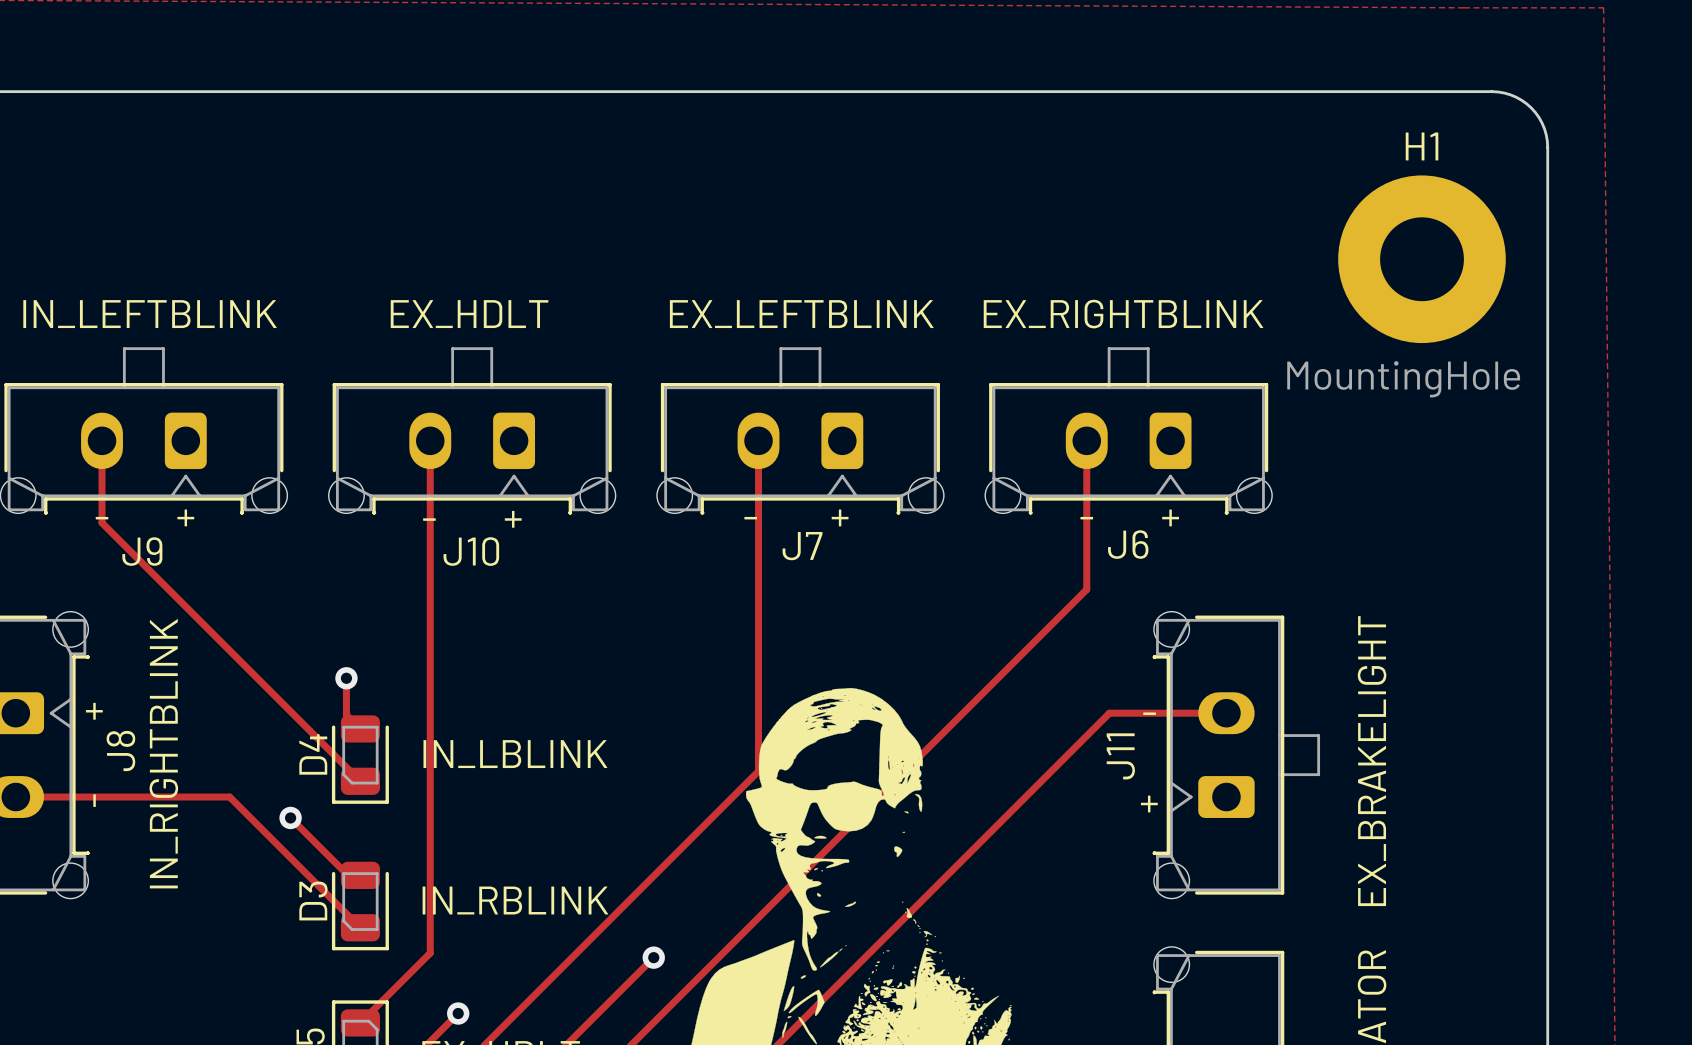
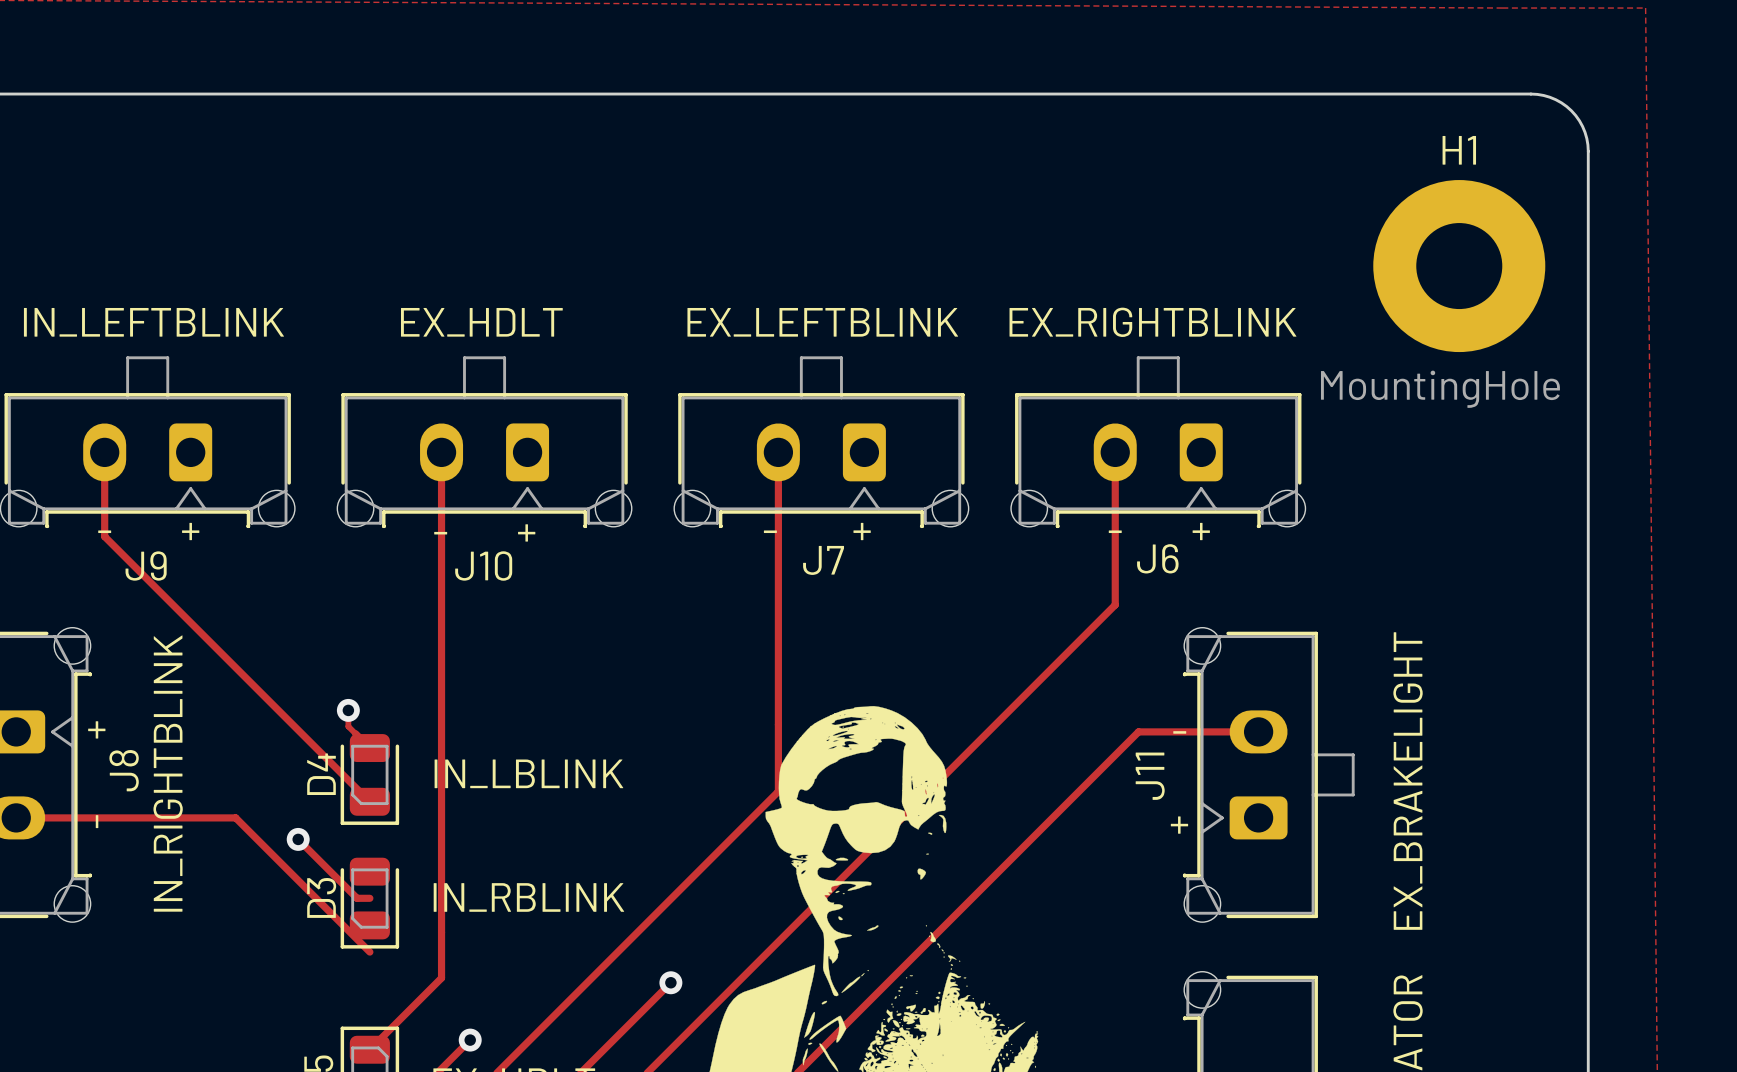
track: (346, 678) (346, 714) -> (348, 710) (348, 726) (355, 733)
via position: (346, 678) -> (348, 710)
D3 position: (360, 906) -> (369, 903)

